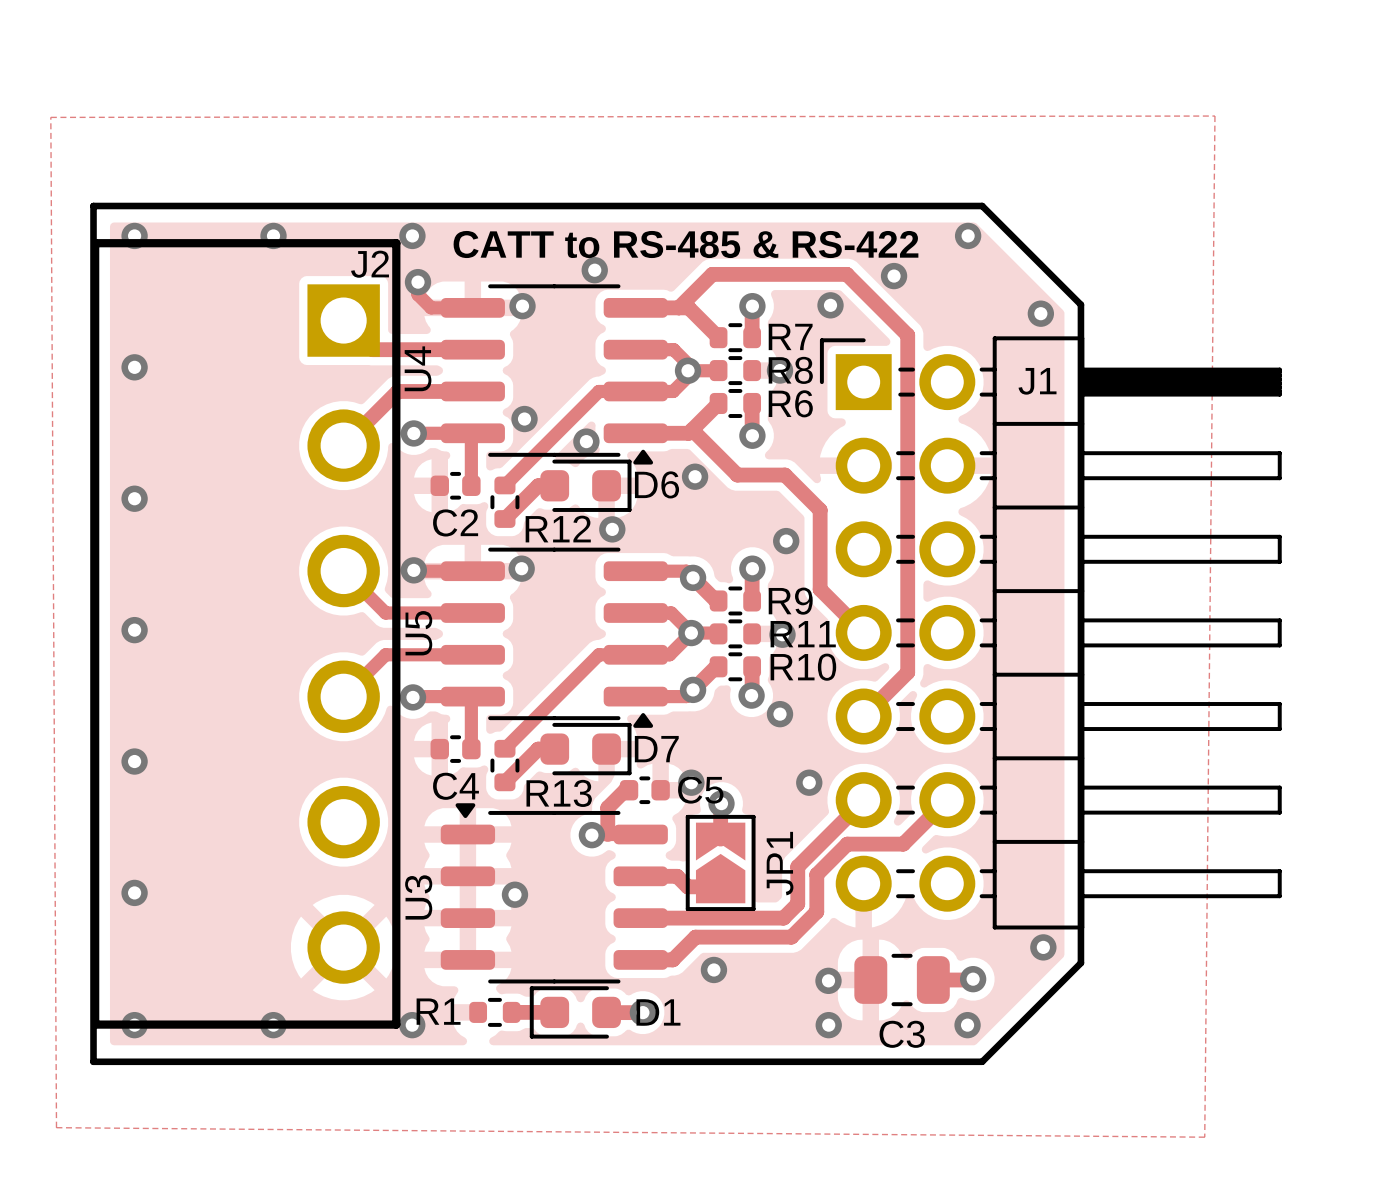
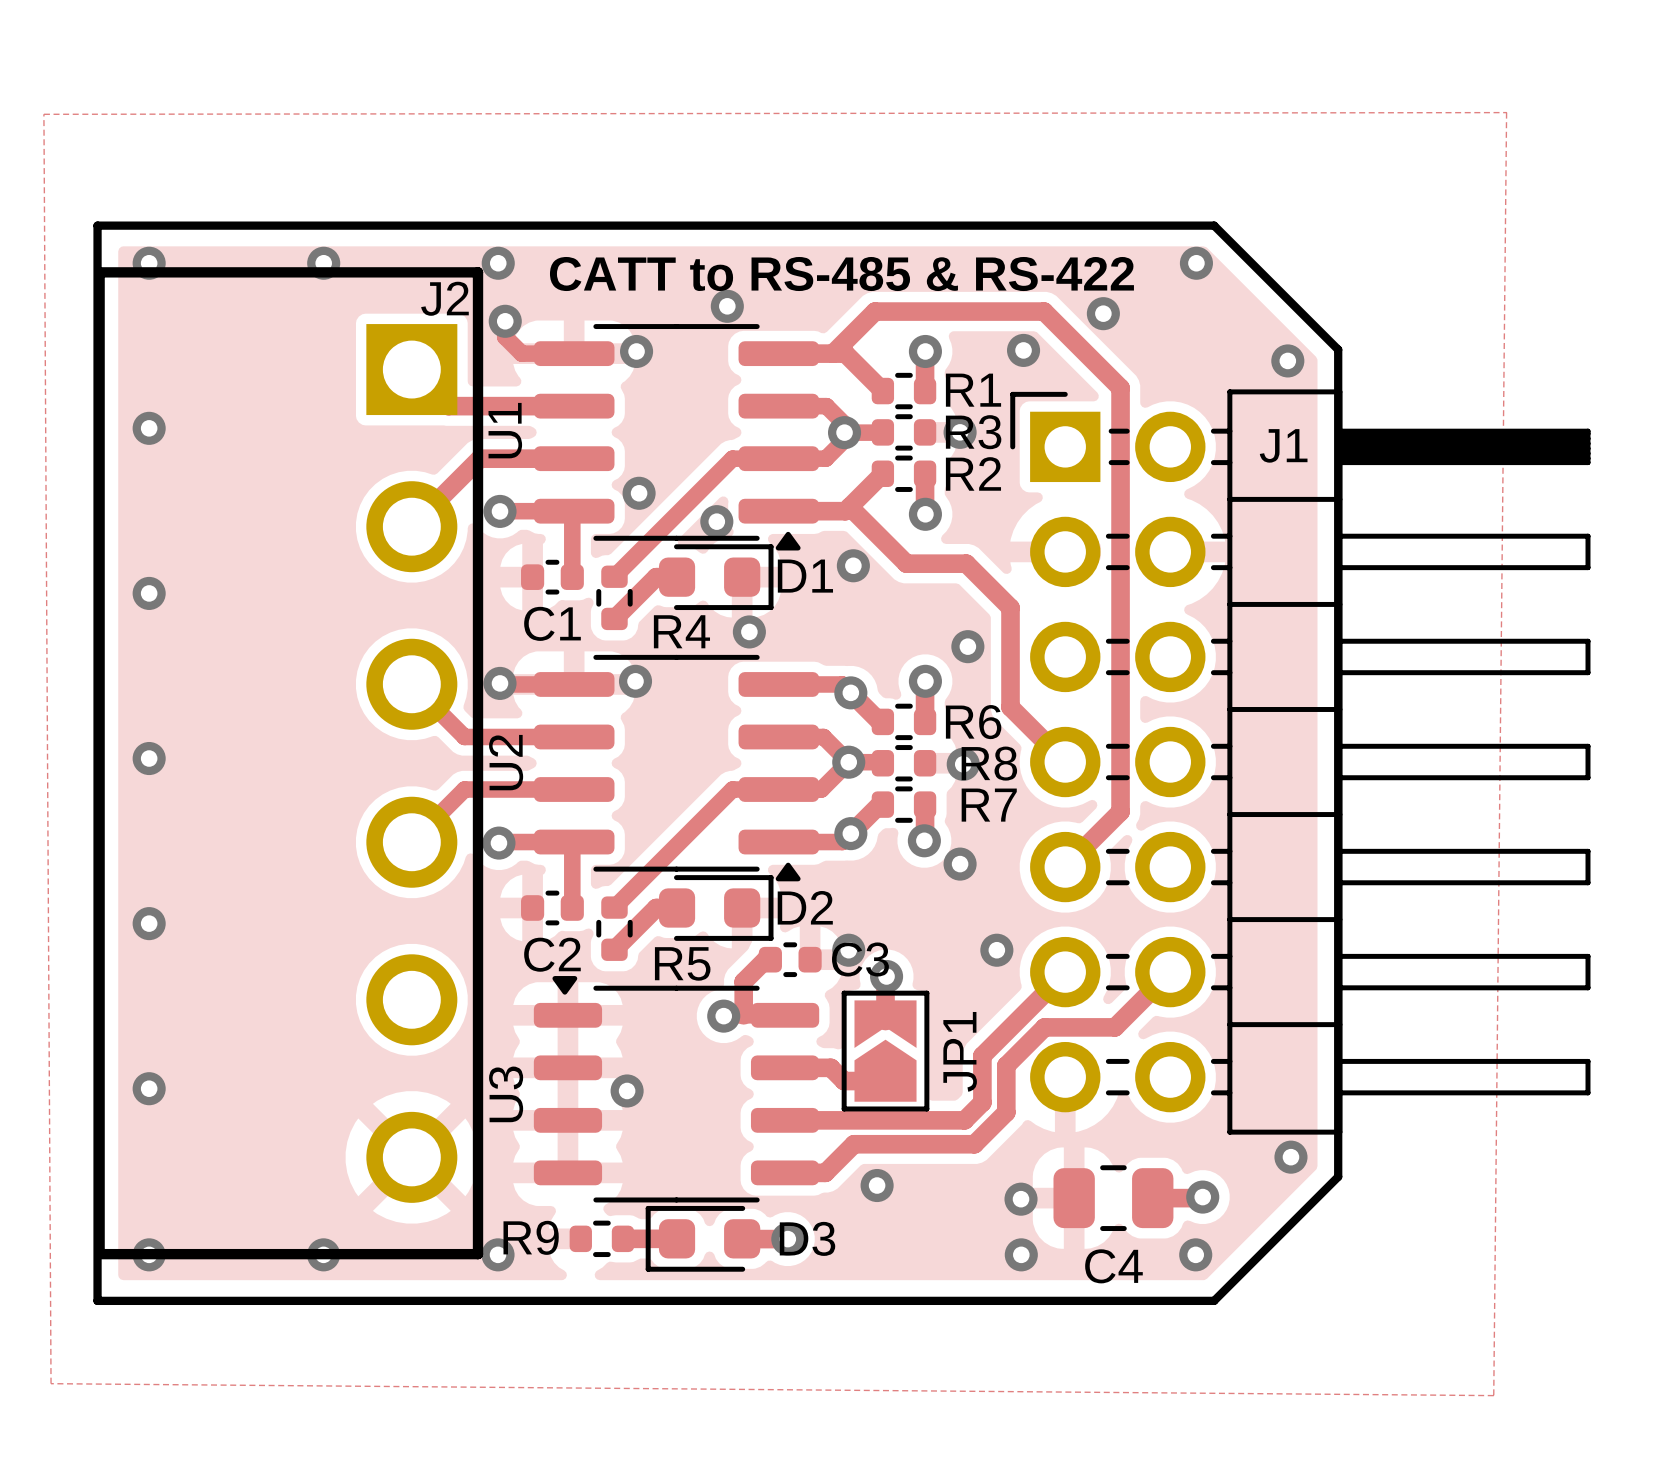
R7 name: R7 (790, 336) -> R1 (973, 390)
U4 name: U4 (418, 368) -> U1 (505, 430)
R8 name: R8 (790, 370) -> R3 (973, 432)
R6 name: R6 (790, 403) -> R2 (973, 473)
D6 name: D6 (657, 484) -> D1 (805, 576)
C2 name: C2 (455, 522) -> C1 (552, 623)
R12 name: R12 (558, 529) -> R4 (681, 631)
R9 name: R9 (790, 601) -> R6 (973, 722)
U5 name: U5 (418, 633) -> U2 (506, 762)
R11 name: R11 (803, 634) -> R8 (989, 763)
R10 name: R10 (803, 667) -> R7 (989, 805)
D7 name: D7 (656, 749) -> D2 (805, 907)
C4 name: C4 (455, 786) -> C2 (552, 954)
C5 name: C5 (700, 790) -> C3 (860, 959)
R13 name: R13 (559, 793) -> R5 (682, 963)
R1 name: R1 (438, 1011) -> R9 (531, 1237)
D1 name: D1 (658, 1012) -> D3 (807, 1238)
C3 name: C3 (902, 1034) -> C4 (1113, 1266)

